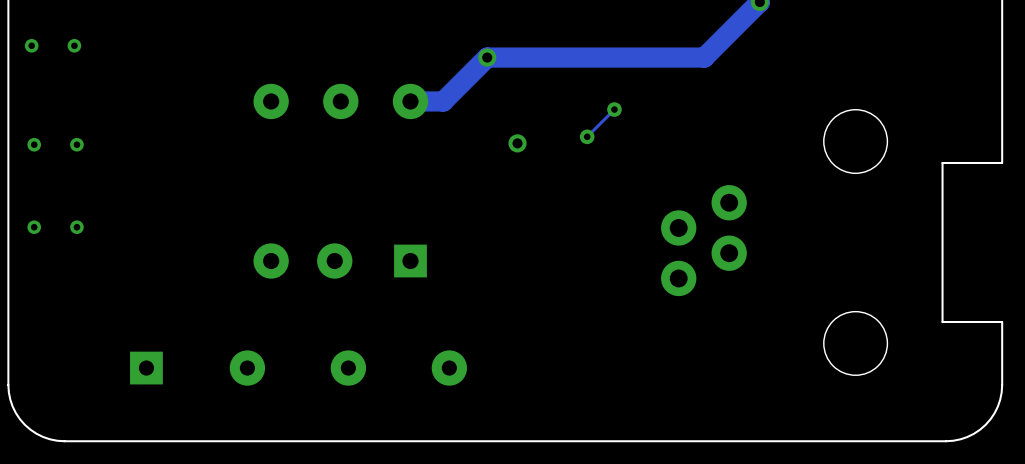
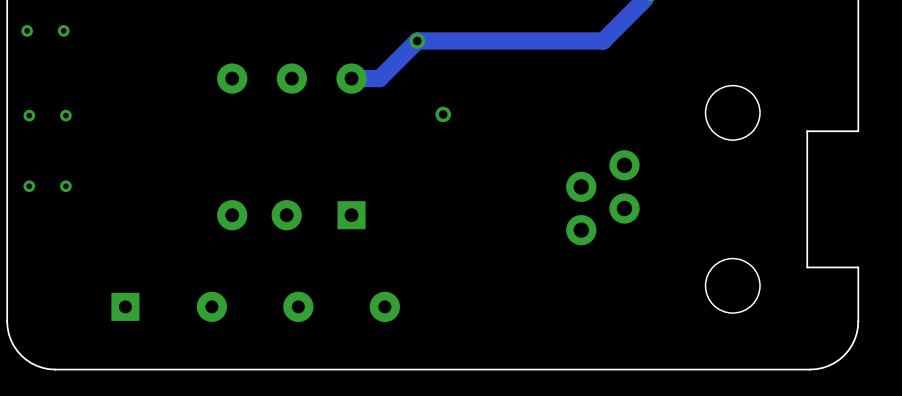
track: (614, 109) (587, 136) -> none
via: (614, 109) -> none
via: (587, 136) -> none

